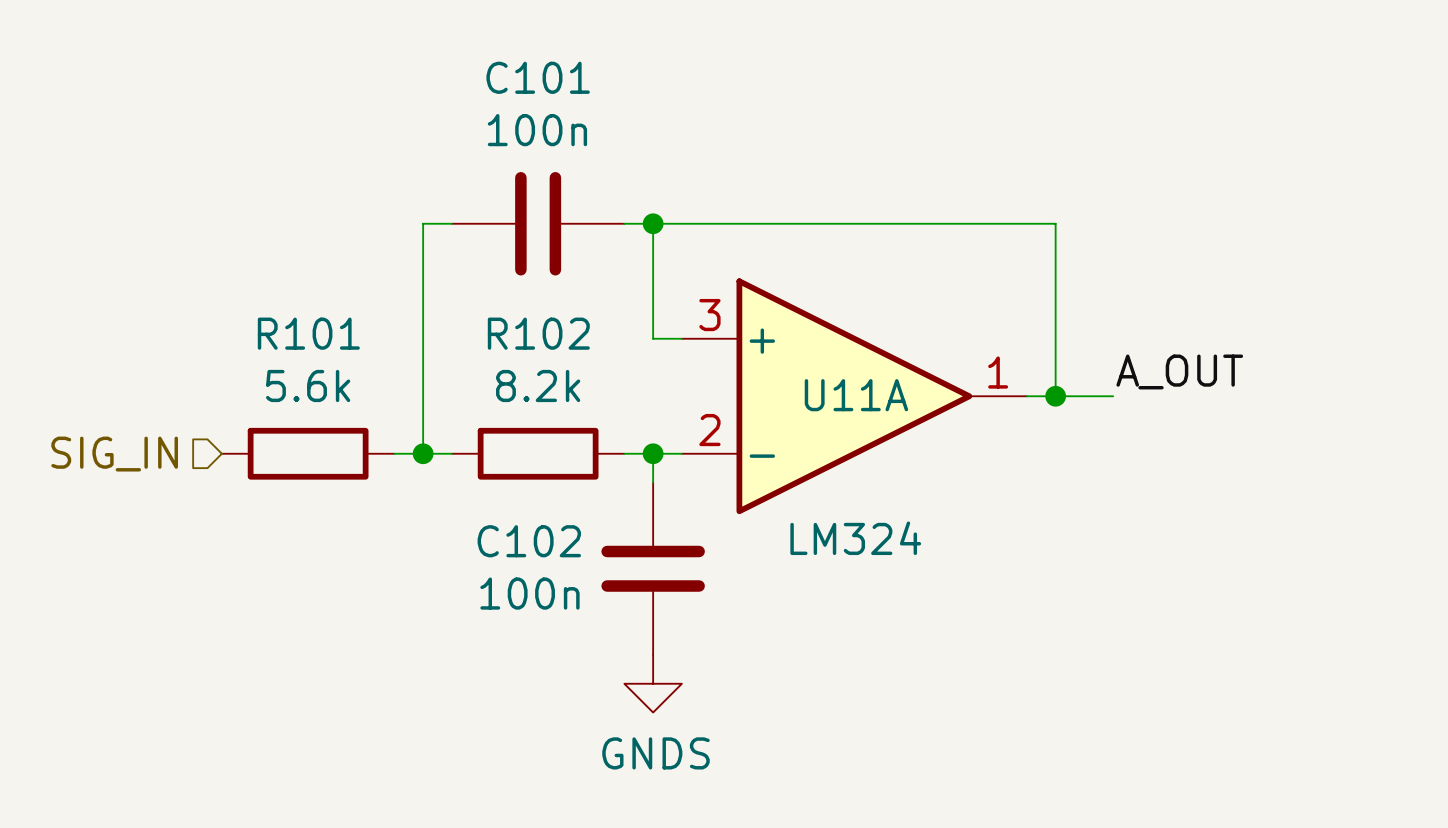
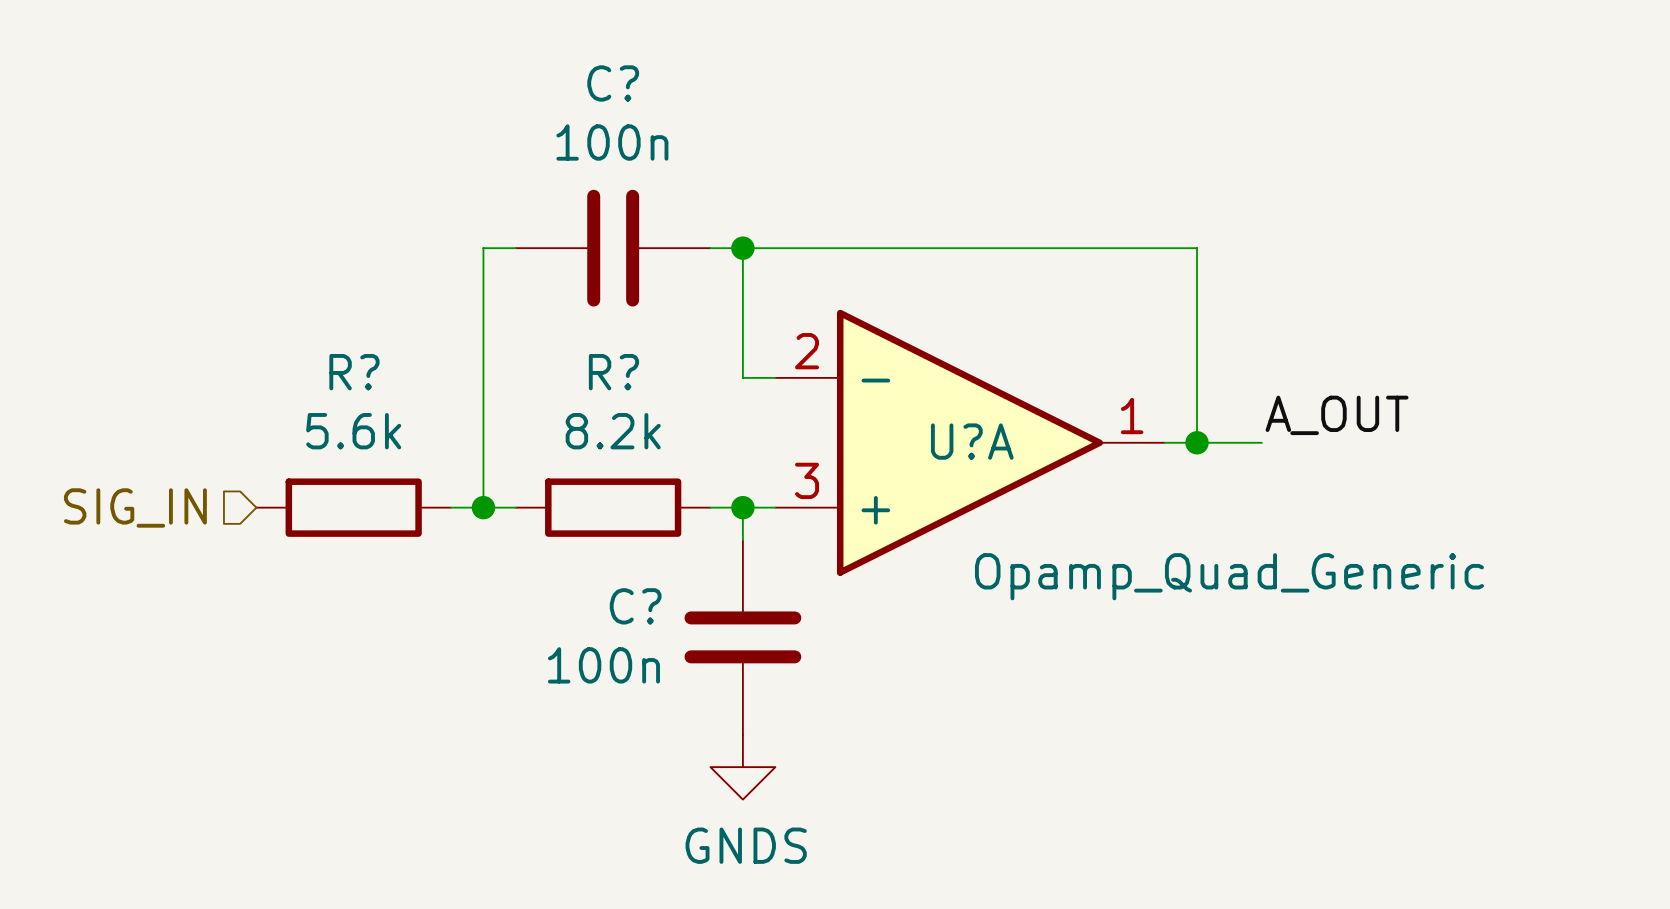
C101 name: C101 (538, 77) -> C? (613, 83)
R101 name: R101 (308, 333) -> R? (354, 372)
R102 name: R102 (538, 333) -> R? (613, 372)
U11A name: U11A (856, 395) -> U?A (972, 441)
U11A flip: as is (854, 396) -> up-down (969, 442)
U11A value: LM324 (855, 538) -> Opamp_Quad_Generic (1229, 576)
C102 name: C102 (529, 541) -> C? (635, 606)

